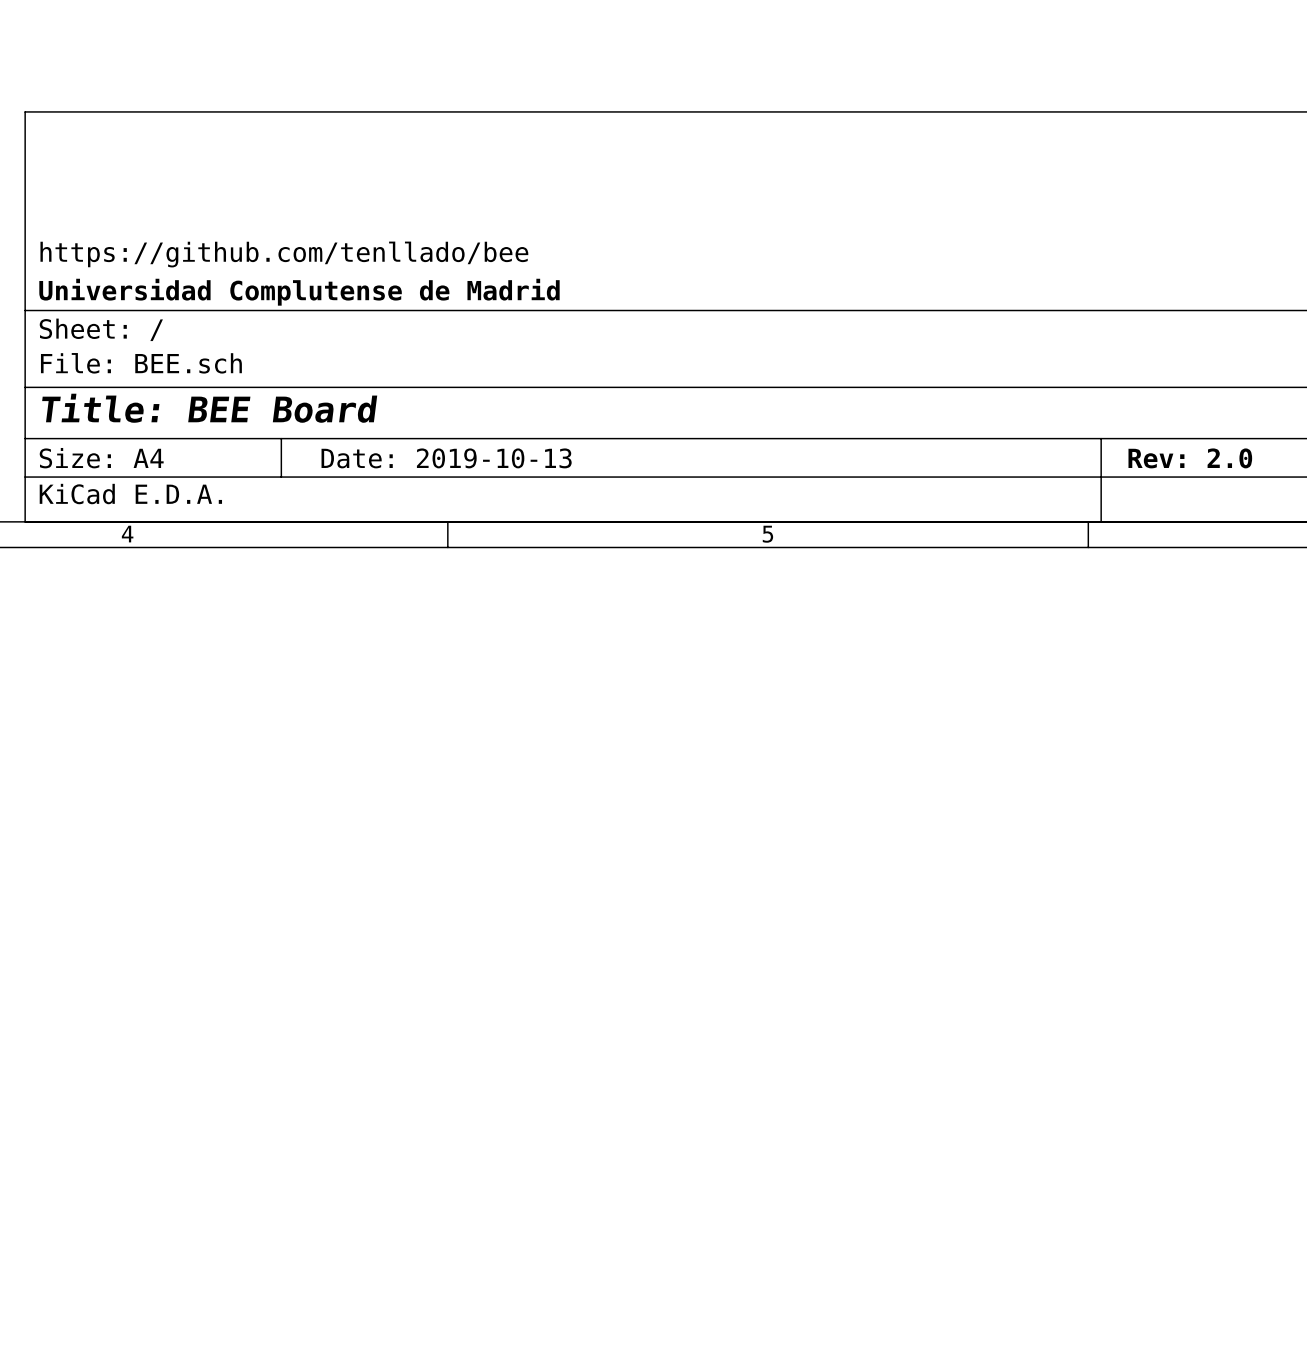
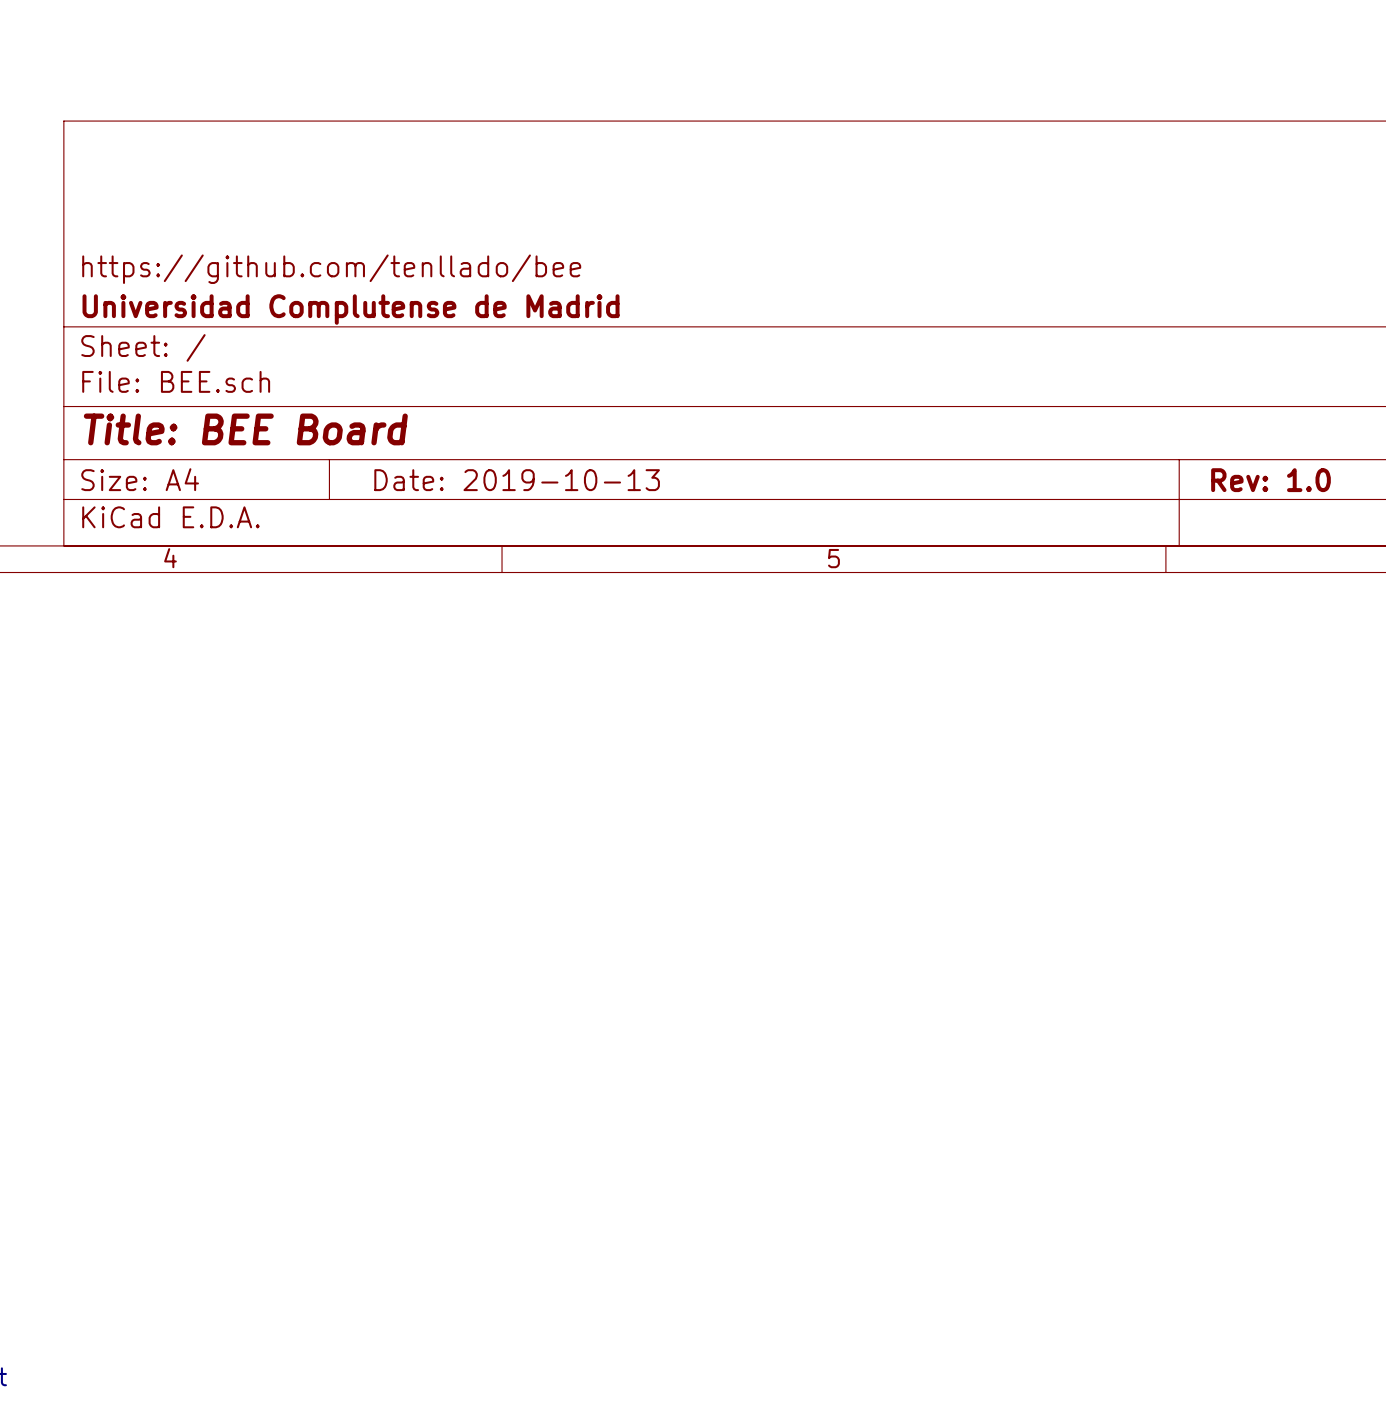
title block: Rev: 2.0 (1190, 458) -> Rev: 1.0 (1270, 480)

